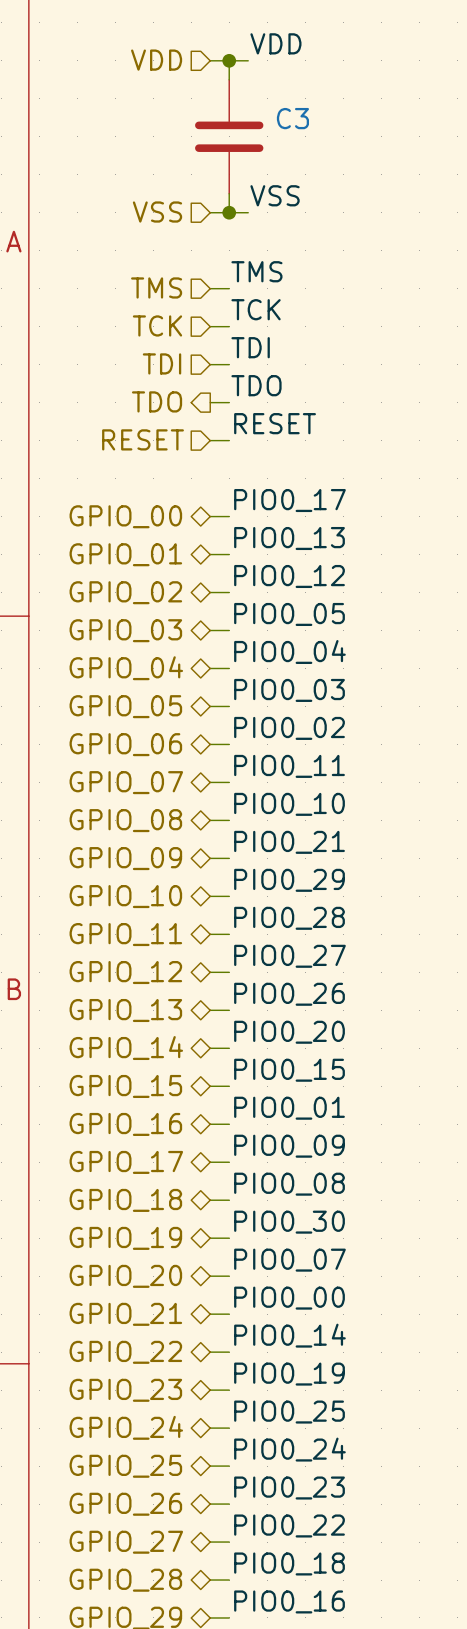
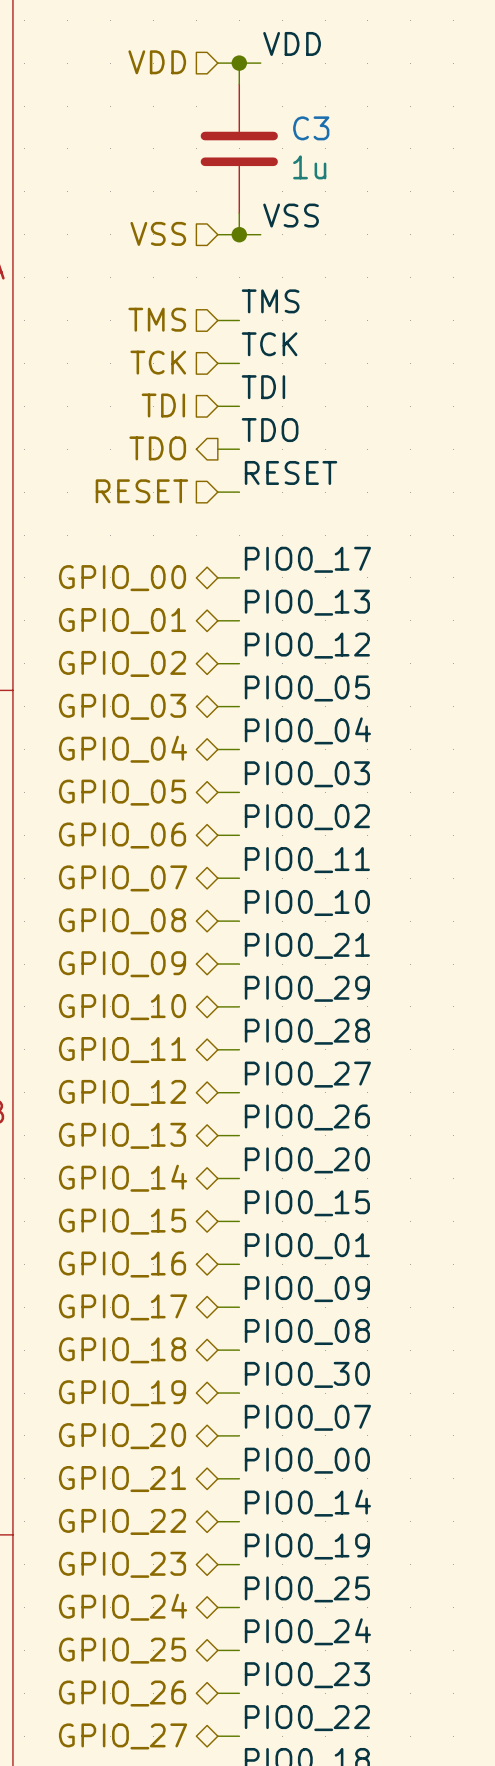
C3 value: none -> 1u (309, 167)

